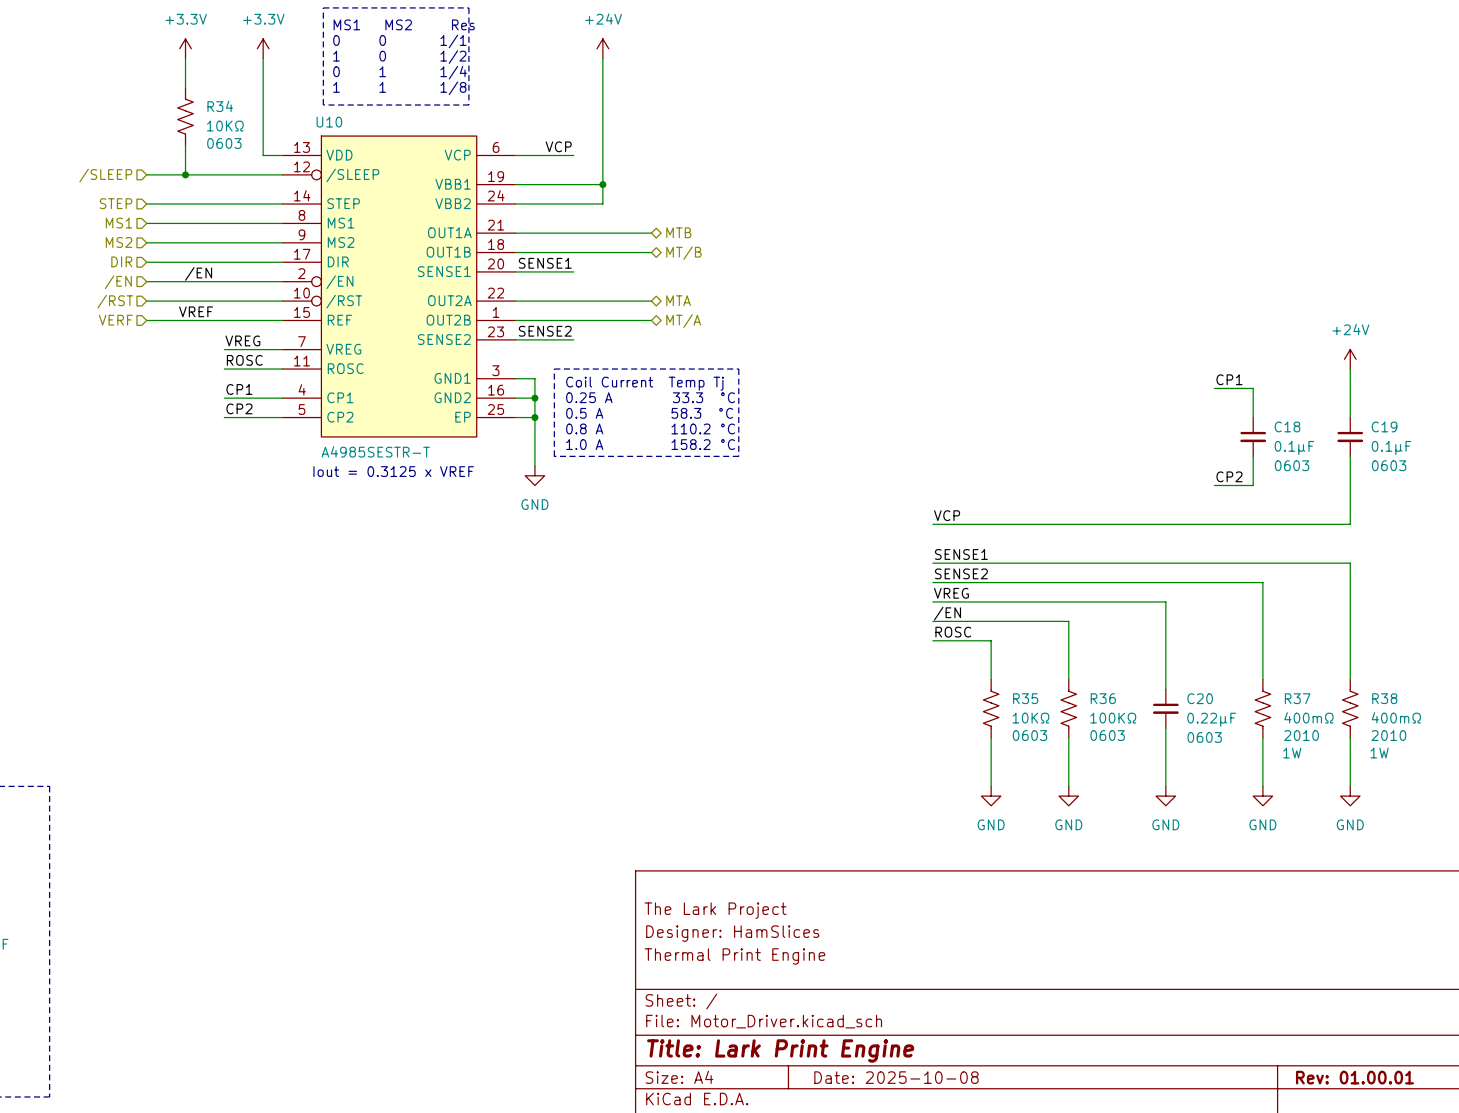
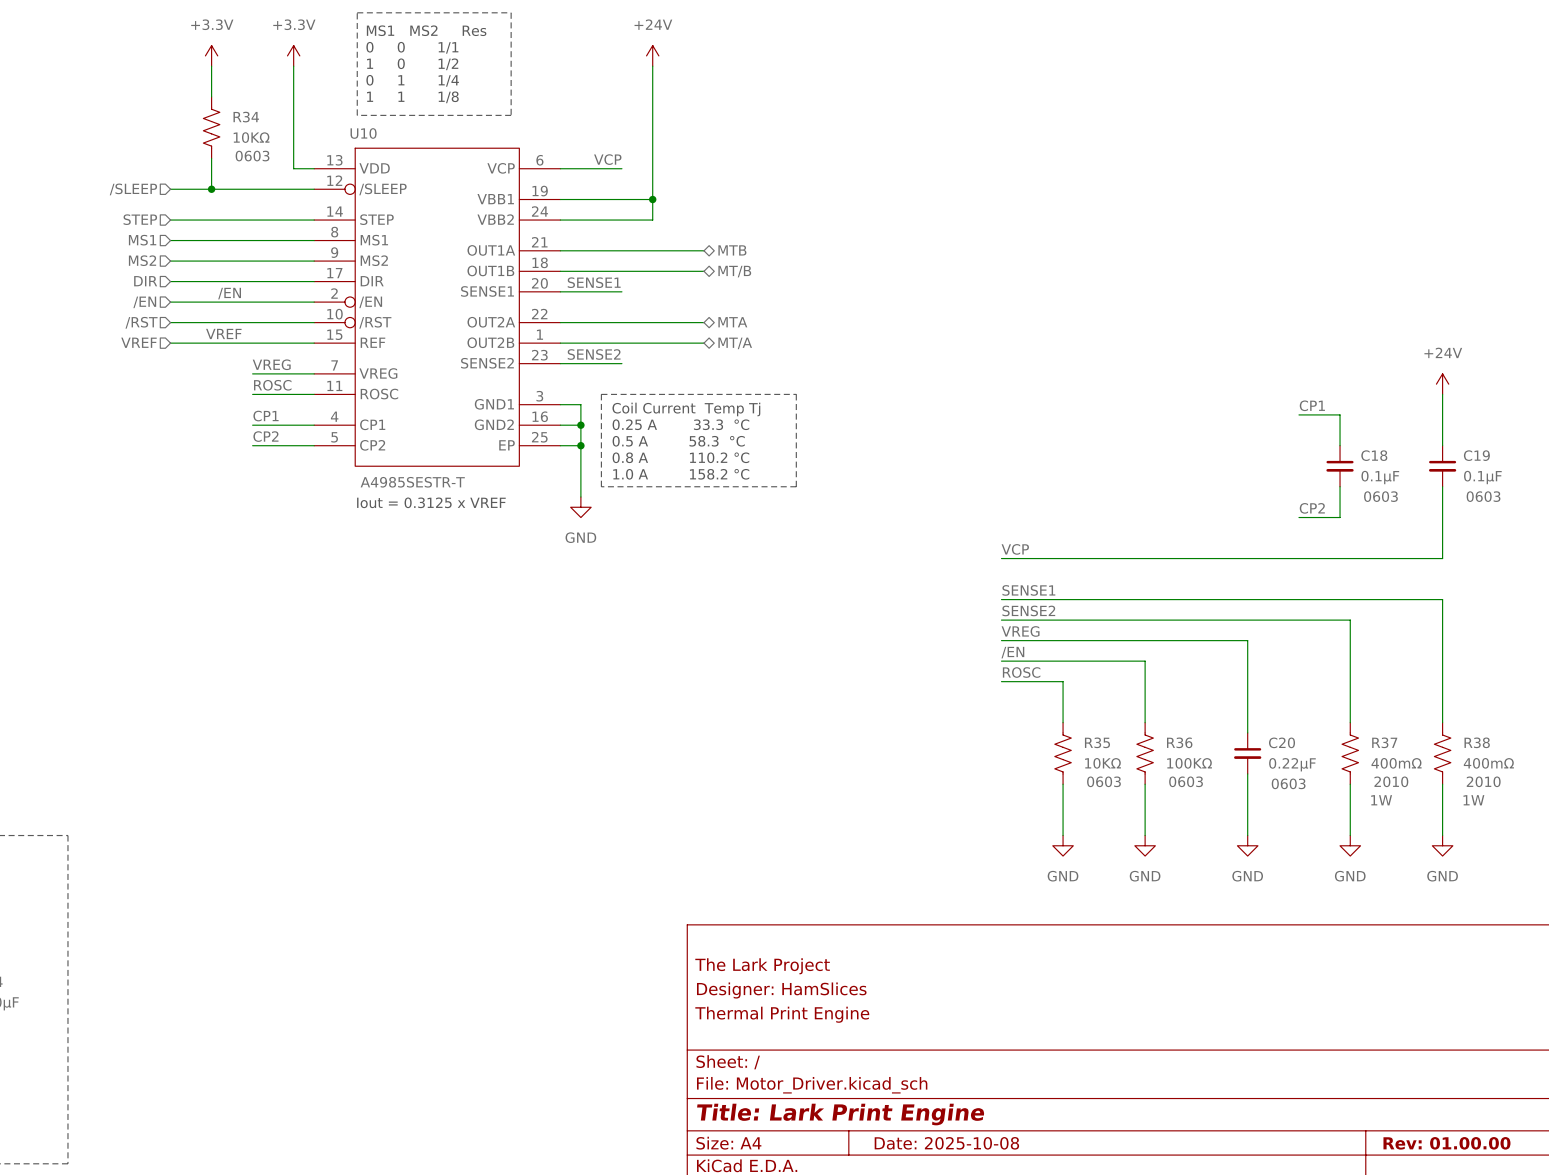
hierarchical label: VERF (115, 320) -> VREF (138, 342)
title block: Rev: 01.00.01 (1354, 1077) -> Rev: 01.00.00 (1446, 1143)

